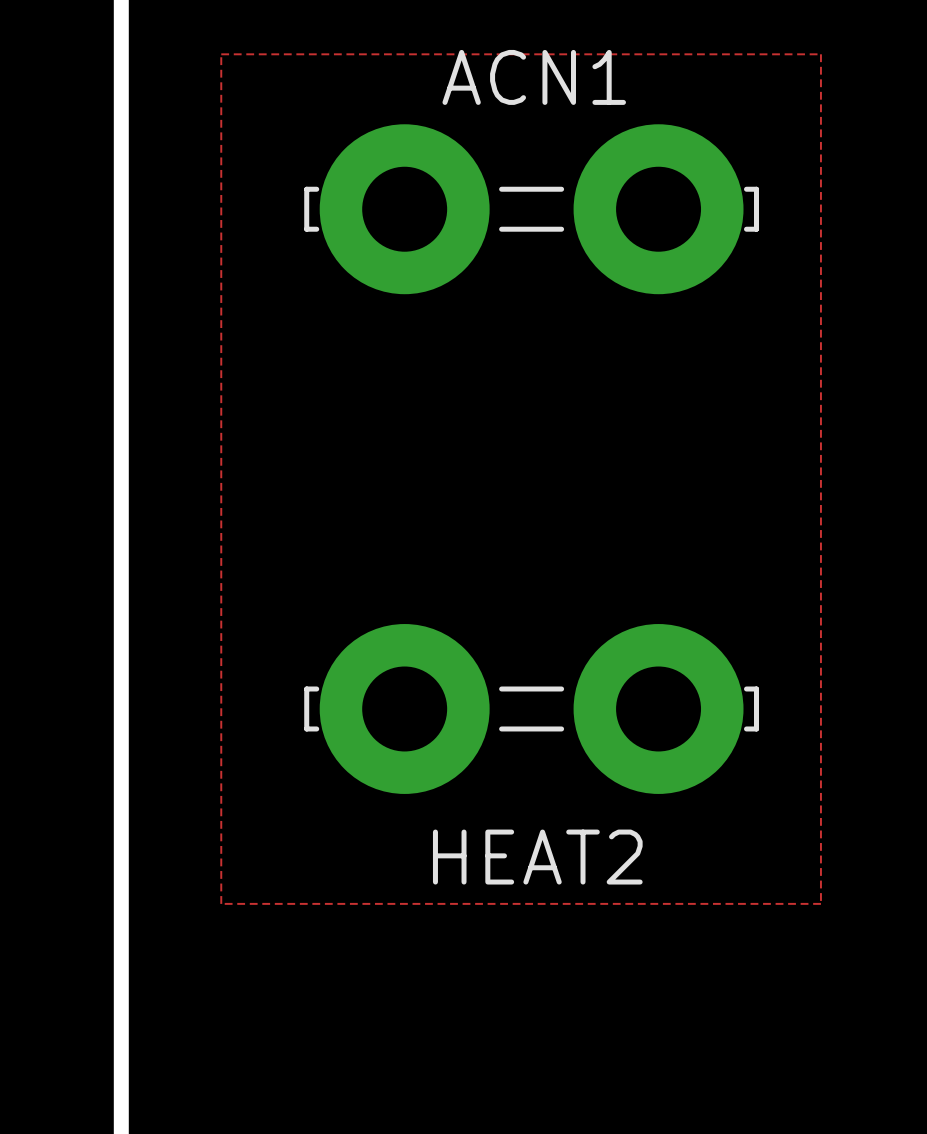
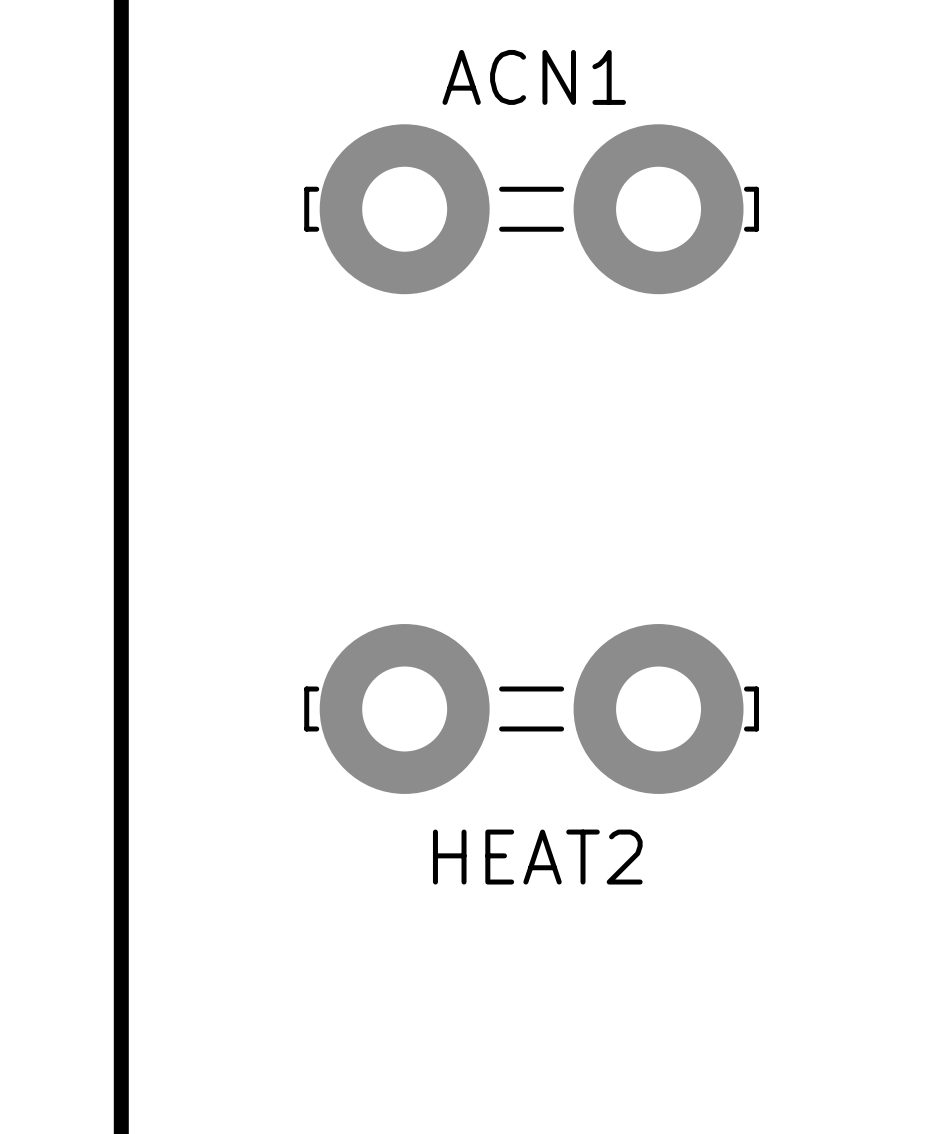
zone outline: (221, 54) (820, 54) (820, 903) (221, 903) (221, 54) -> none

